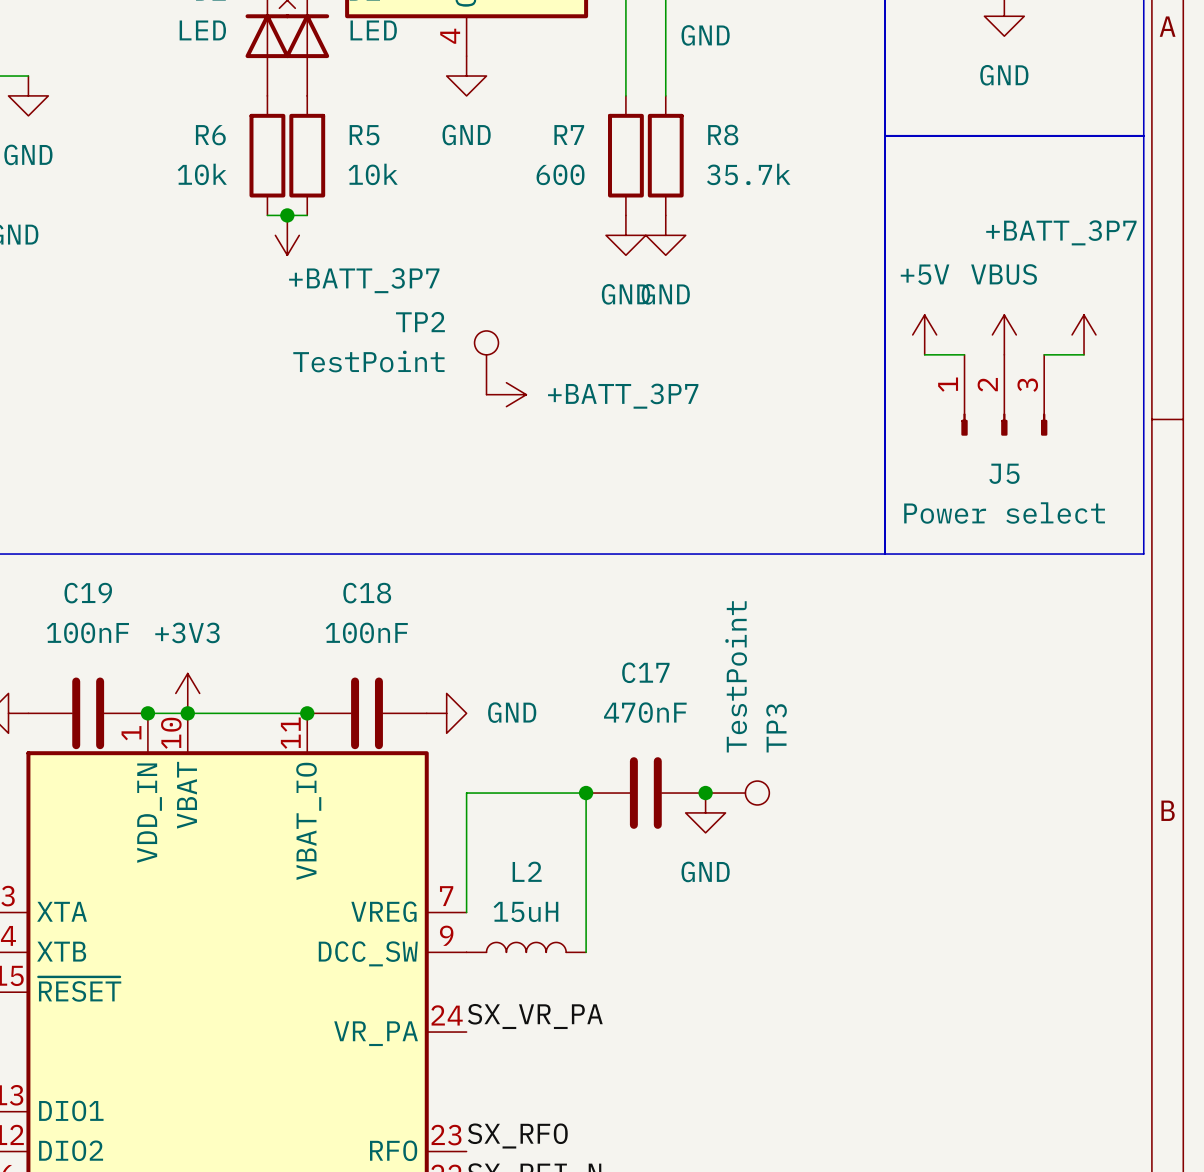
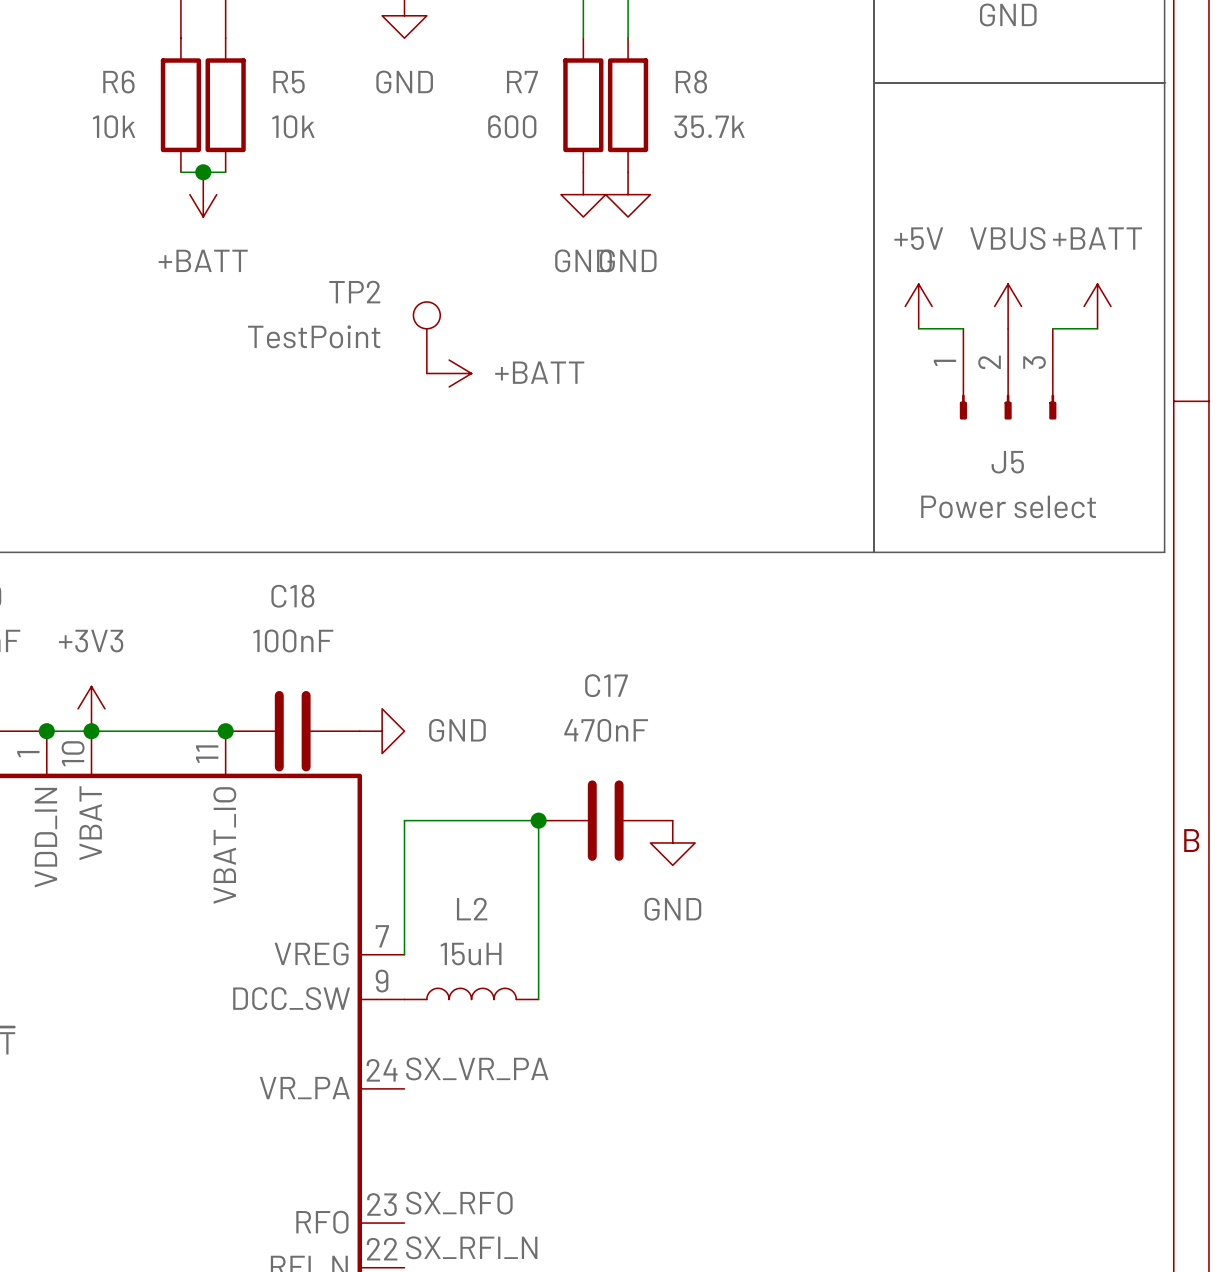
power symbol: +BATT_3P7 (287, 235) -> +BATT (203, 194)
power symbol: +BATT_3P7 (1084, 334) -> +BATT (1097, 306)
power symbol: +BATT_3P7 (506, 394) -> +BATT (449, 373)
junction: (705, 793) -> none
TP3: TestPoint (737, 793) -> none

